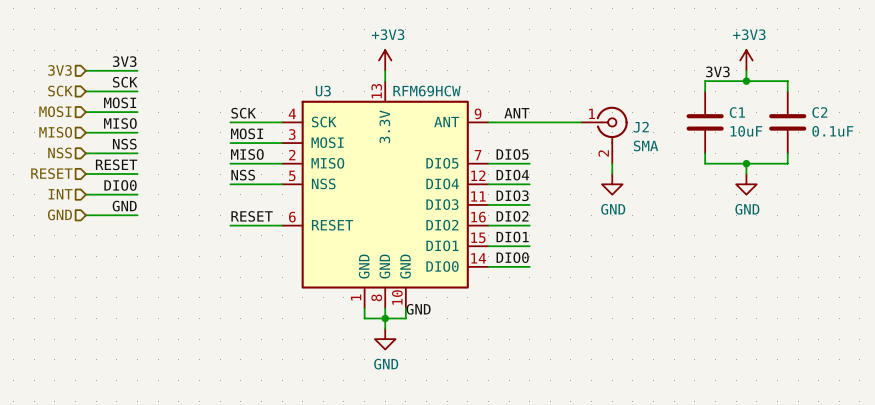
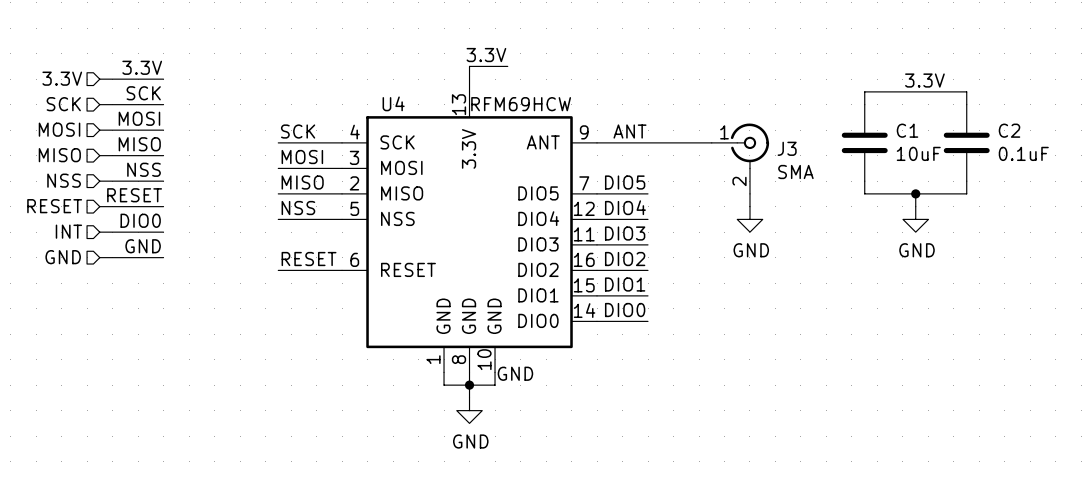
label: none -> 3.3V (486, 55)
power symbol: +3V3 (385, 60) -> none
wire: none -> (507, 66) (469, 66) (469, 79)
power symbol: +3V3 (746, 60) -> none
label: 3V3 (124, 61) -> 3.3V (142, 67)
hierarchical label: 3V3 (59, 70) -> 3.3V (62, 78)
wire: (746, 70) (746, 81) -> none
label: 3V3 (717, 71) -> none
label: none -> 3.3V (924, 80)
junction: (746, 81) -> none
U3 name: U3 (323, 91) -> U4 (393, 103)
J2 name: J2 (641, 127) -> J3 (787, 148)

